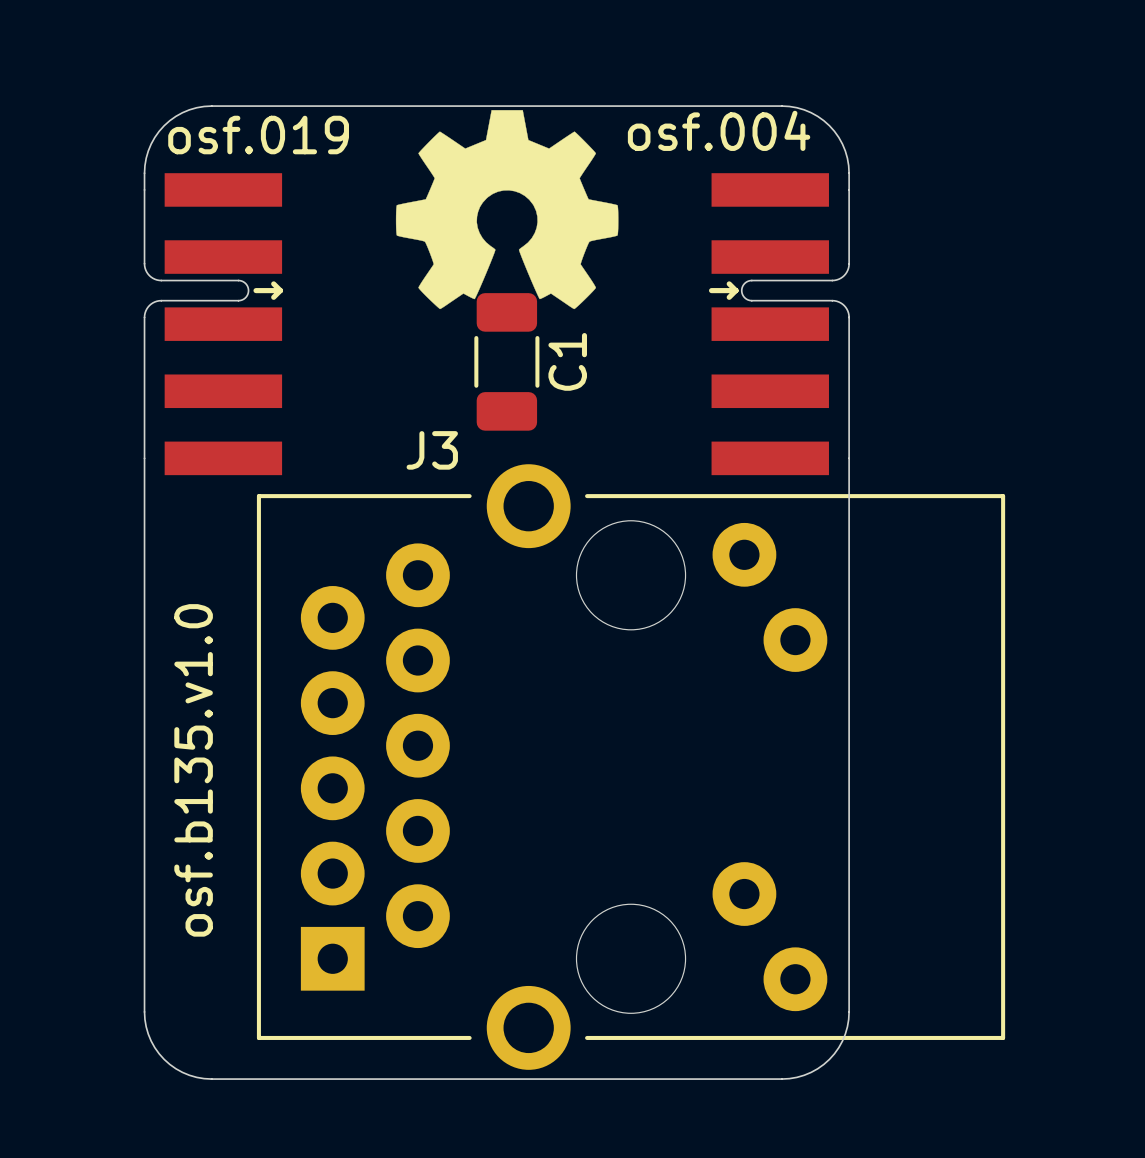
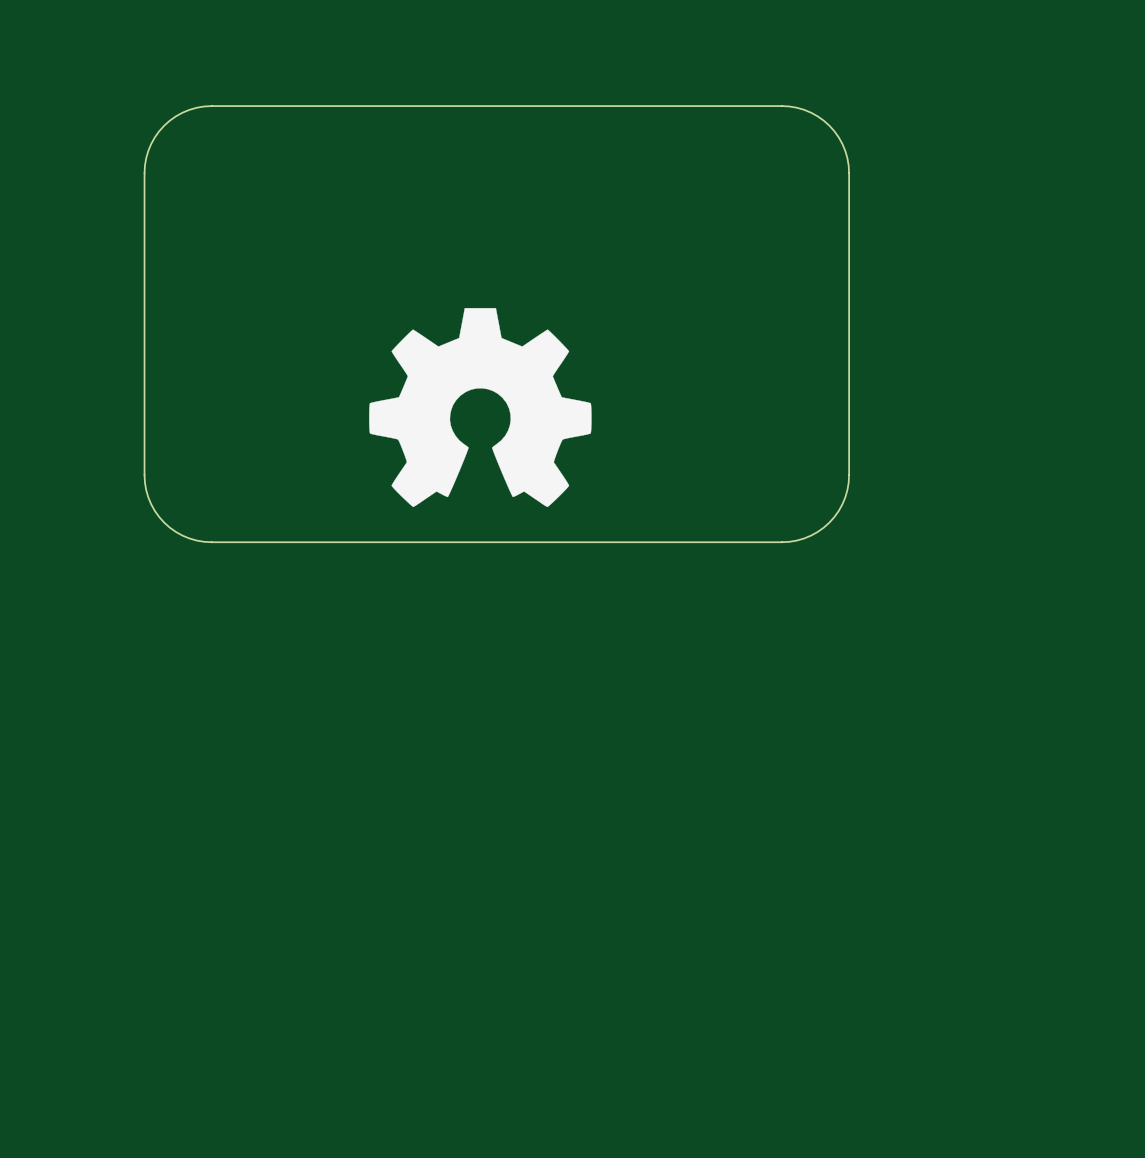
text: osf.004 (719, 130) -> none
text: osf.019 (258, 135) -> none
board edge: none -> (144, 189) (144, 458)
board edge: none -> (849, 189) (849, 458)
drawing position: (507, 209) -> (480, 407)
part: (213, 324) -> none
part: (779, 324) -> none
C1: (506, 361) -> none
board edge: (144, 475) (144, 1019) (148, 1034) (154, 1047) (169, 1064) (189, 1075) (211, 1079) (782, 1079) (796, 1077) (811, 1072) (829, 1059) (842, 1041) (847, 1026) (849, 1011) (849, 475) -> (144, 475) (146, 490) (151, 504) (164, 522) (175, 531) (189, 538) (211, 542) (789, 541) (811, 535) (823, 527) (834, 516) (845, 497) (849, 475)
J3: (631, 767) -> none
text: osf.b135.v1.0 (193, 770) -> none

